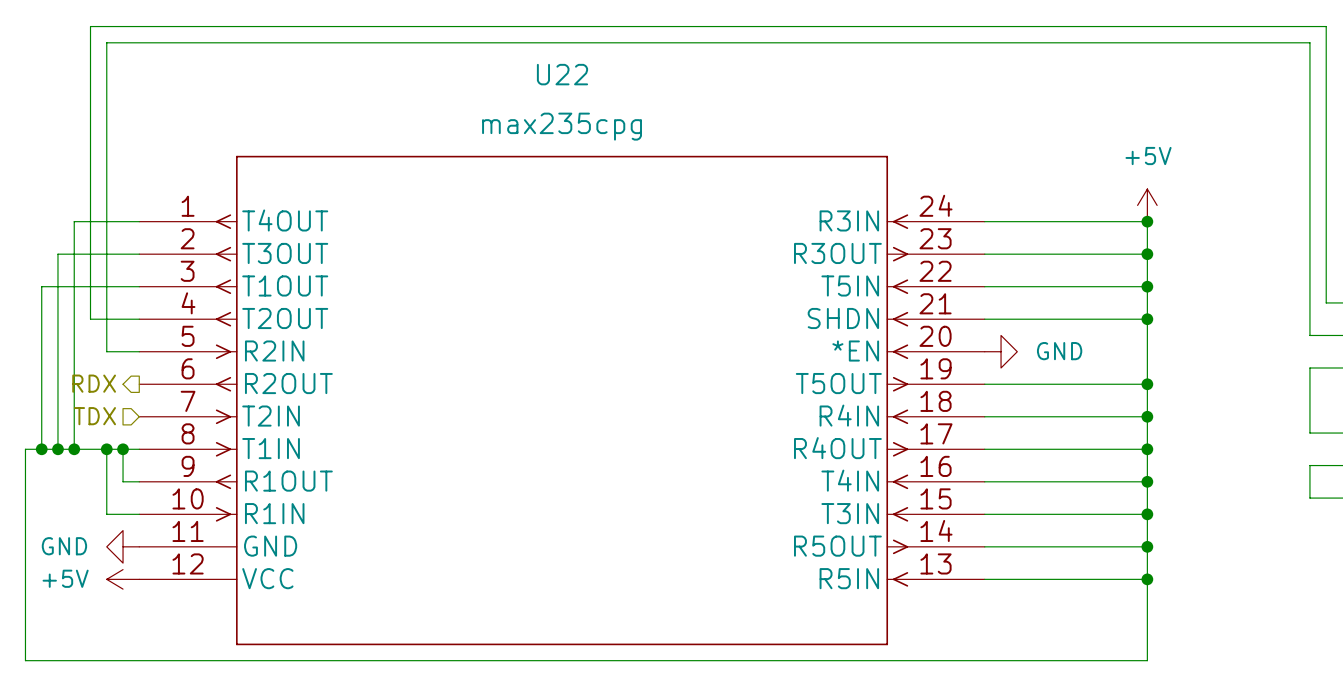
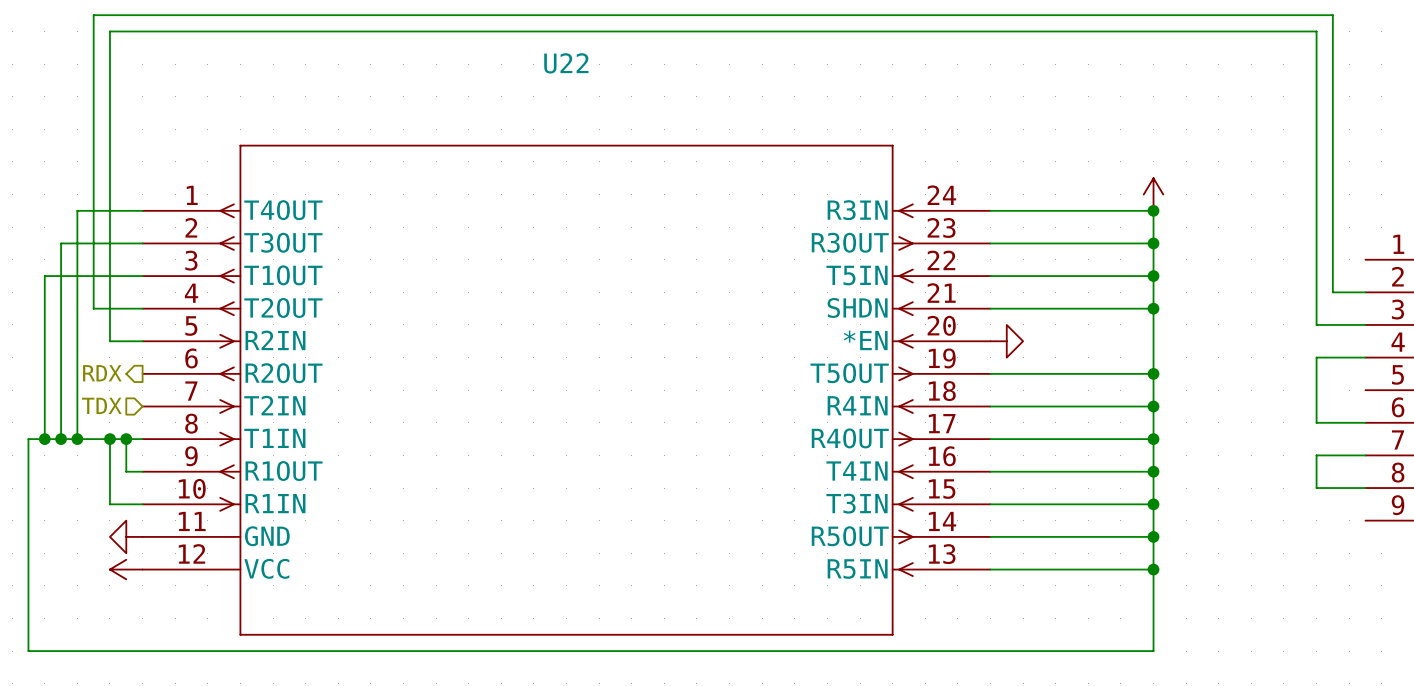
U22 value: max235cpg (562, 126) -> none
power symbol text: +5V (1148, 156) -> none
power symbol text: GND (1059, 351) -> none
power symbol text: GND (64, 546) -> none
power symbol text: +5V (65, 578) -> none

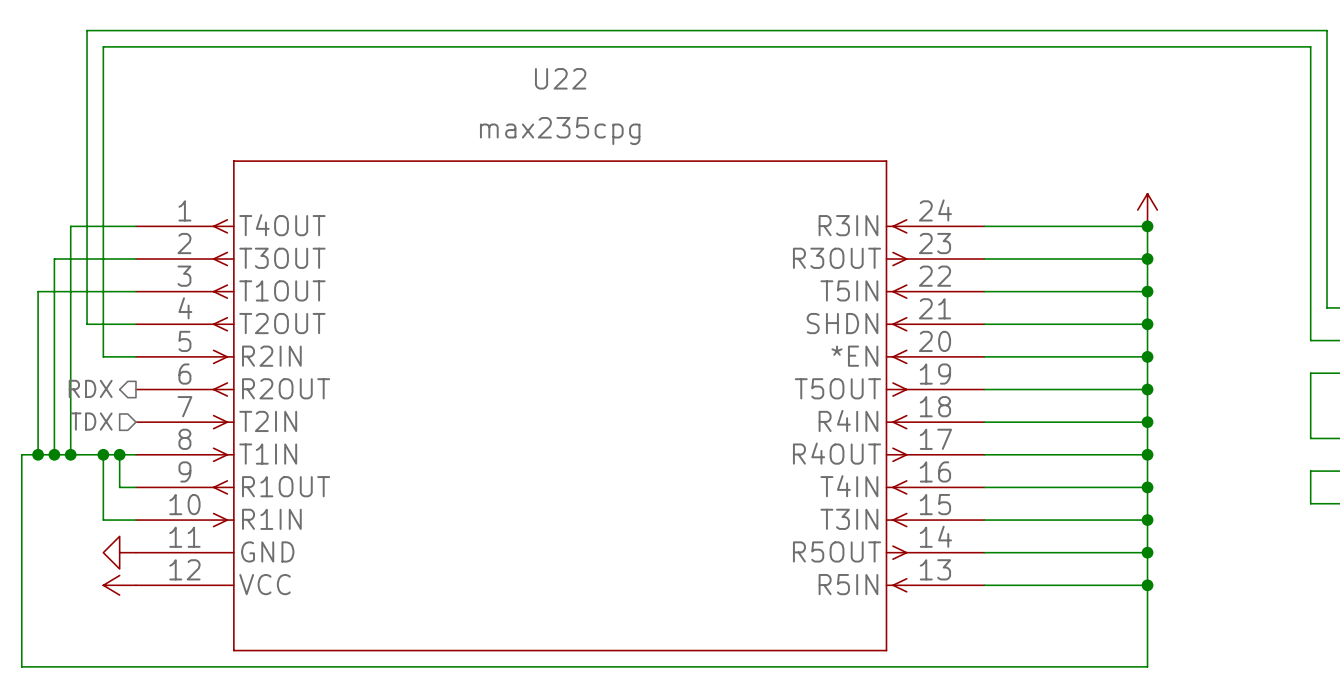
U22 value: none -> max235cpg (560, 131)
wire: none -> (984, 356) (1147, 356)
power symbol: (1006, 341) -> none
junction: none -> (1147, 356)

